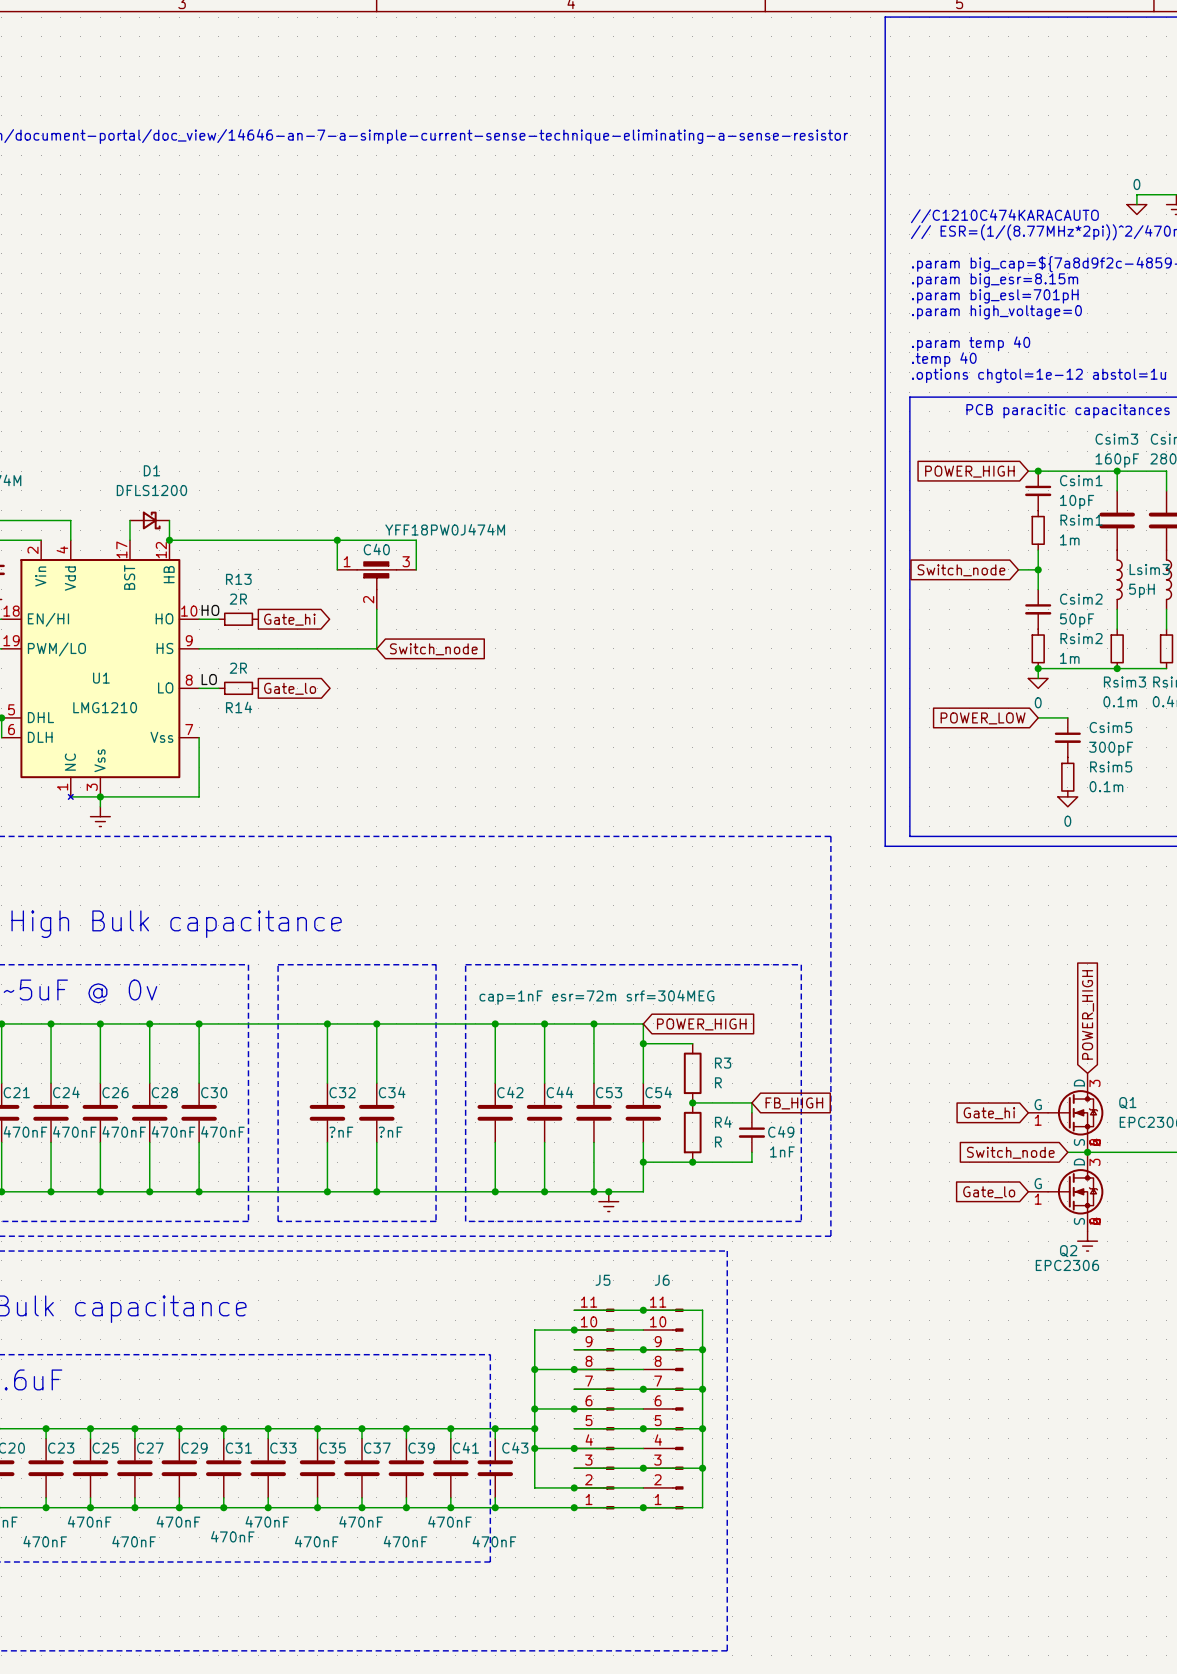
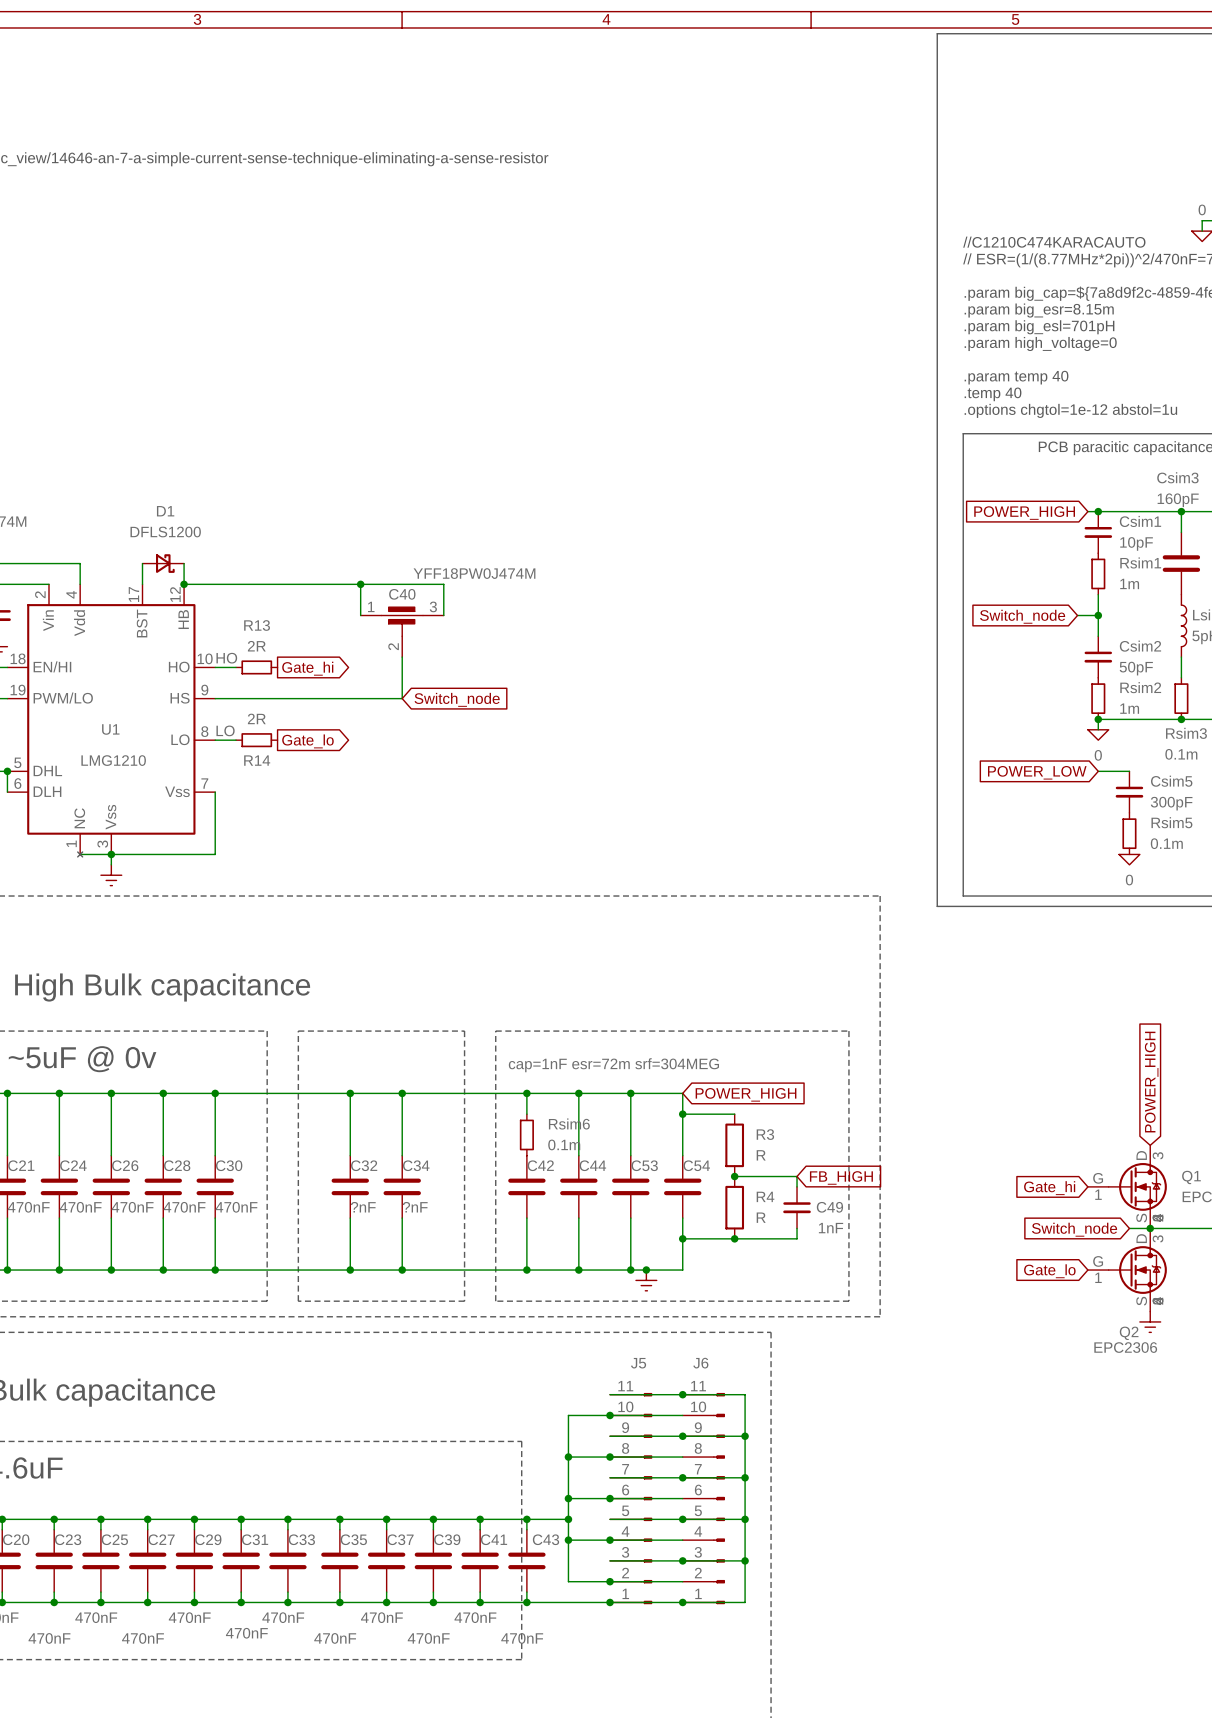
wire: (495, 1043) (495, 1083) -> none
Rsim6: none -> 0.1m (526, 1134)

